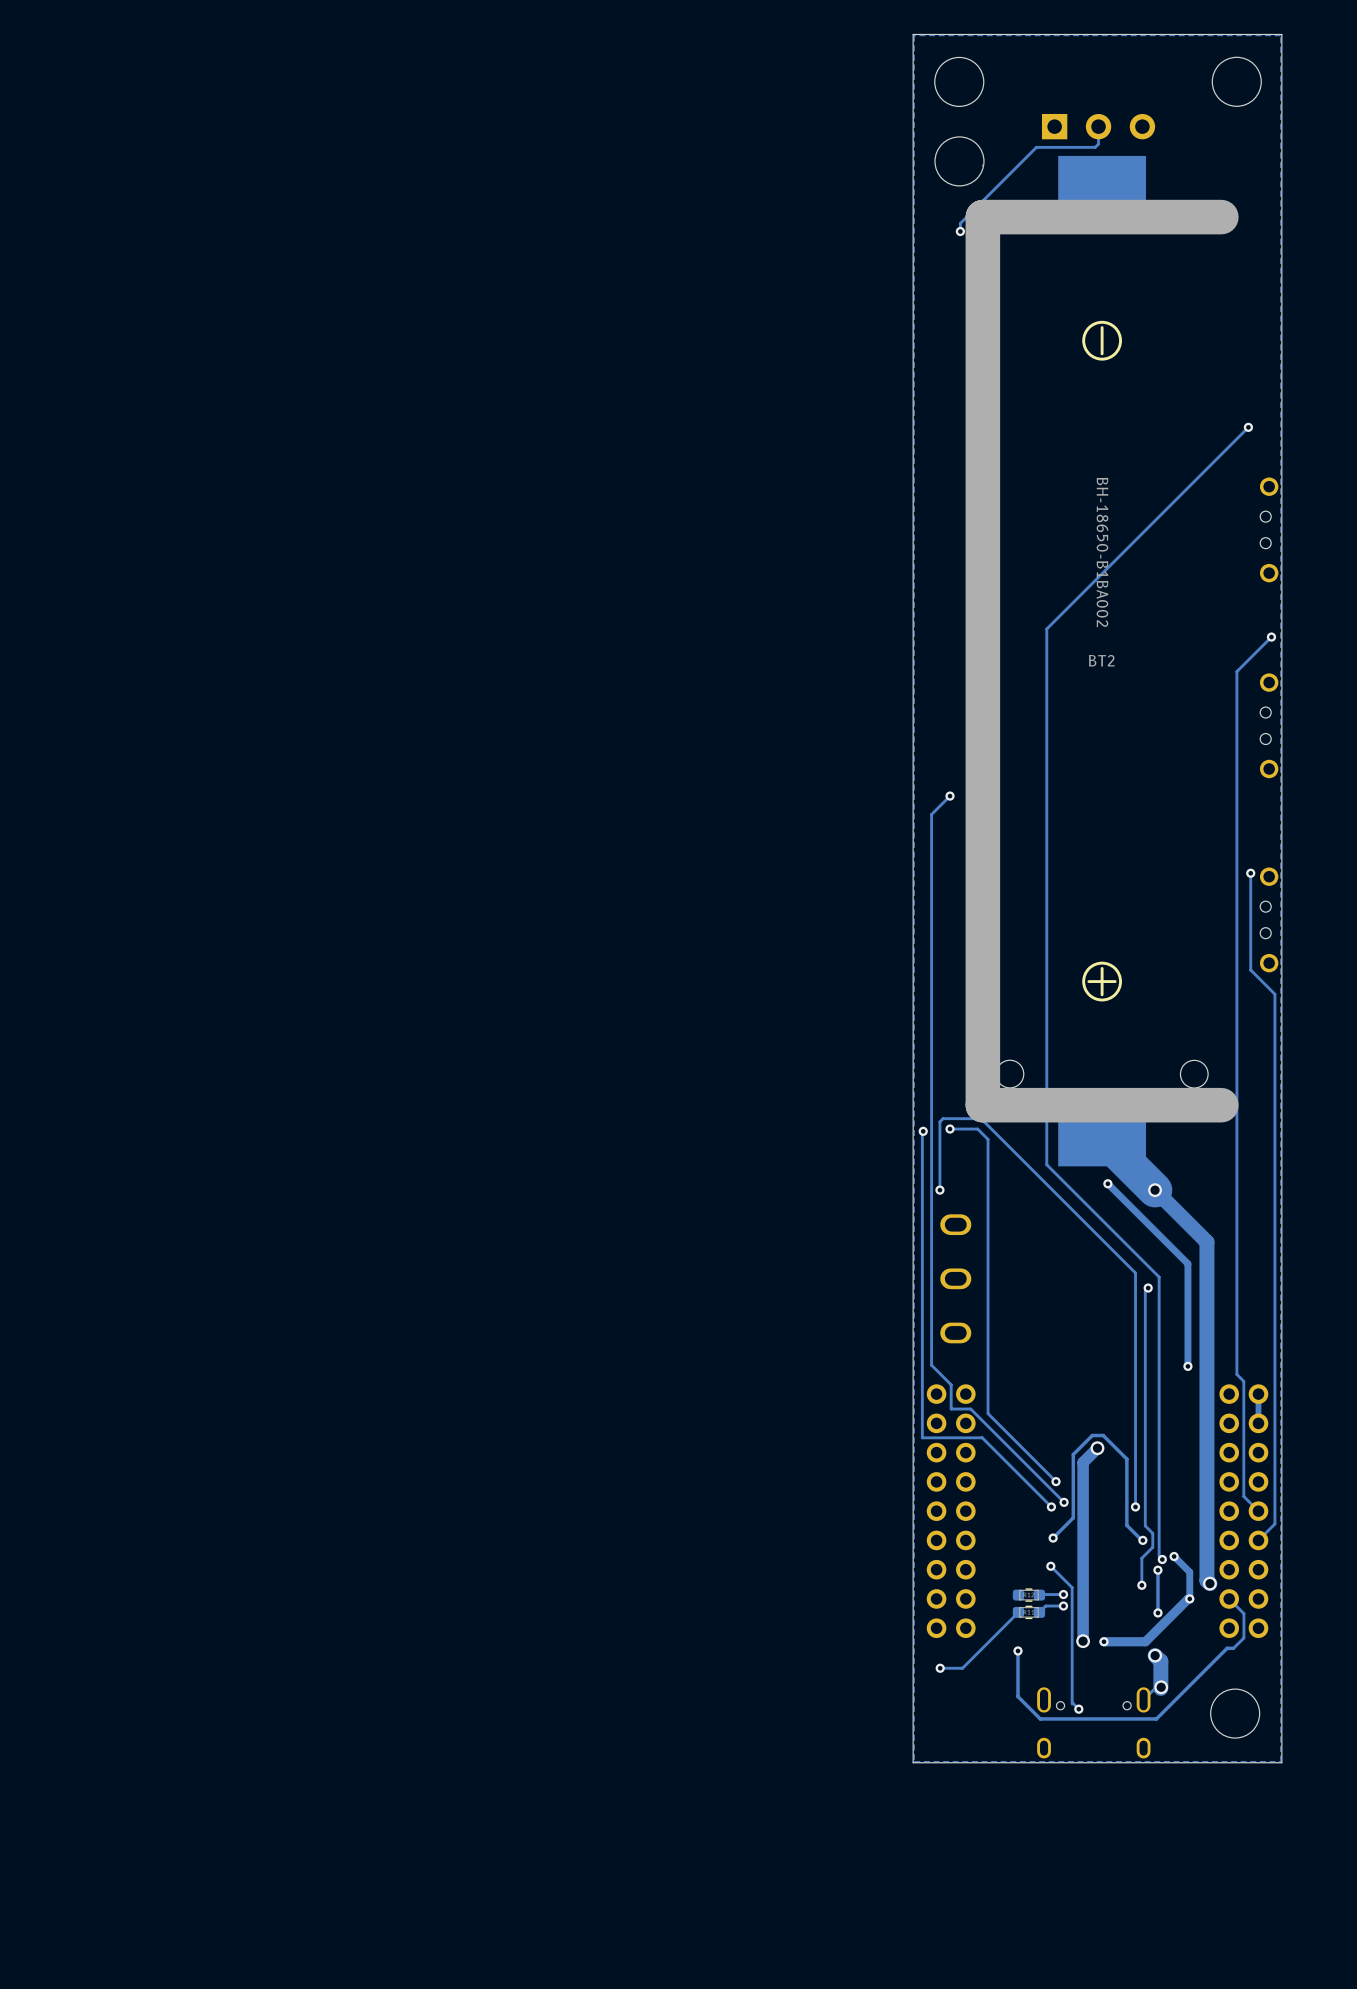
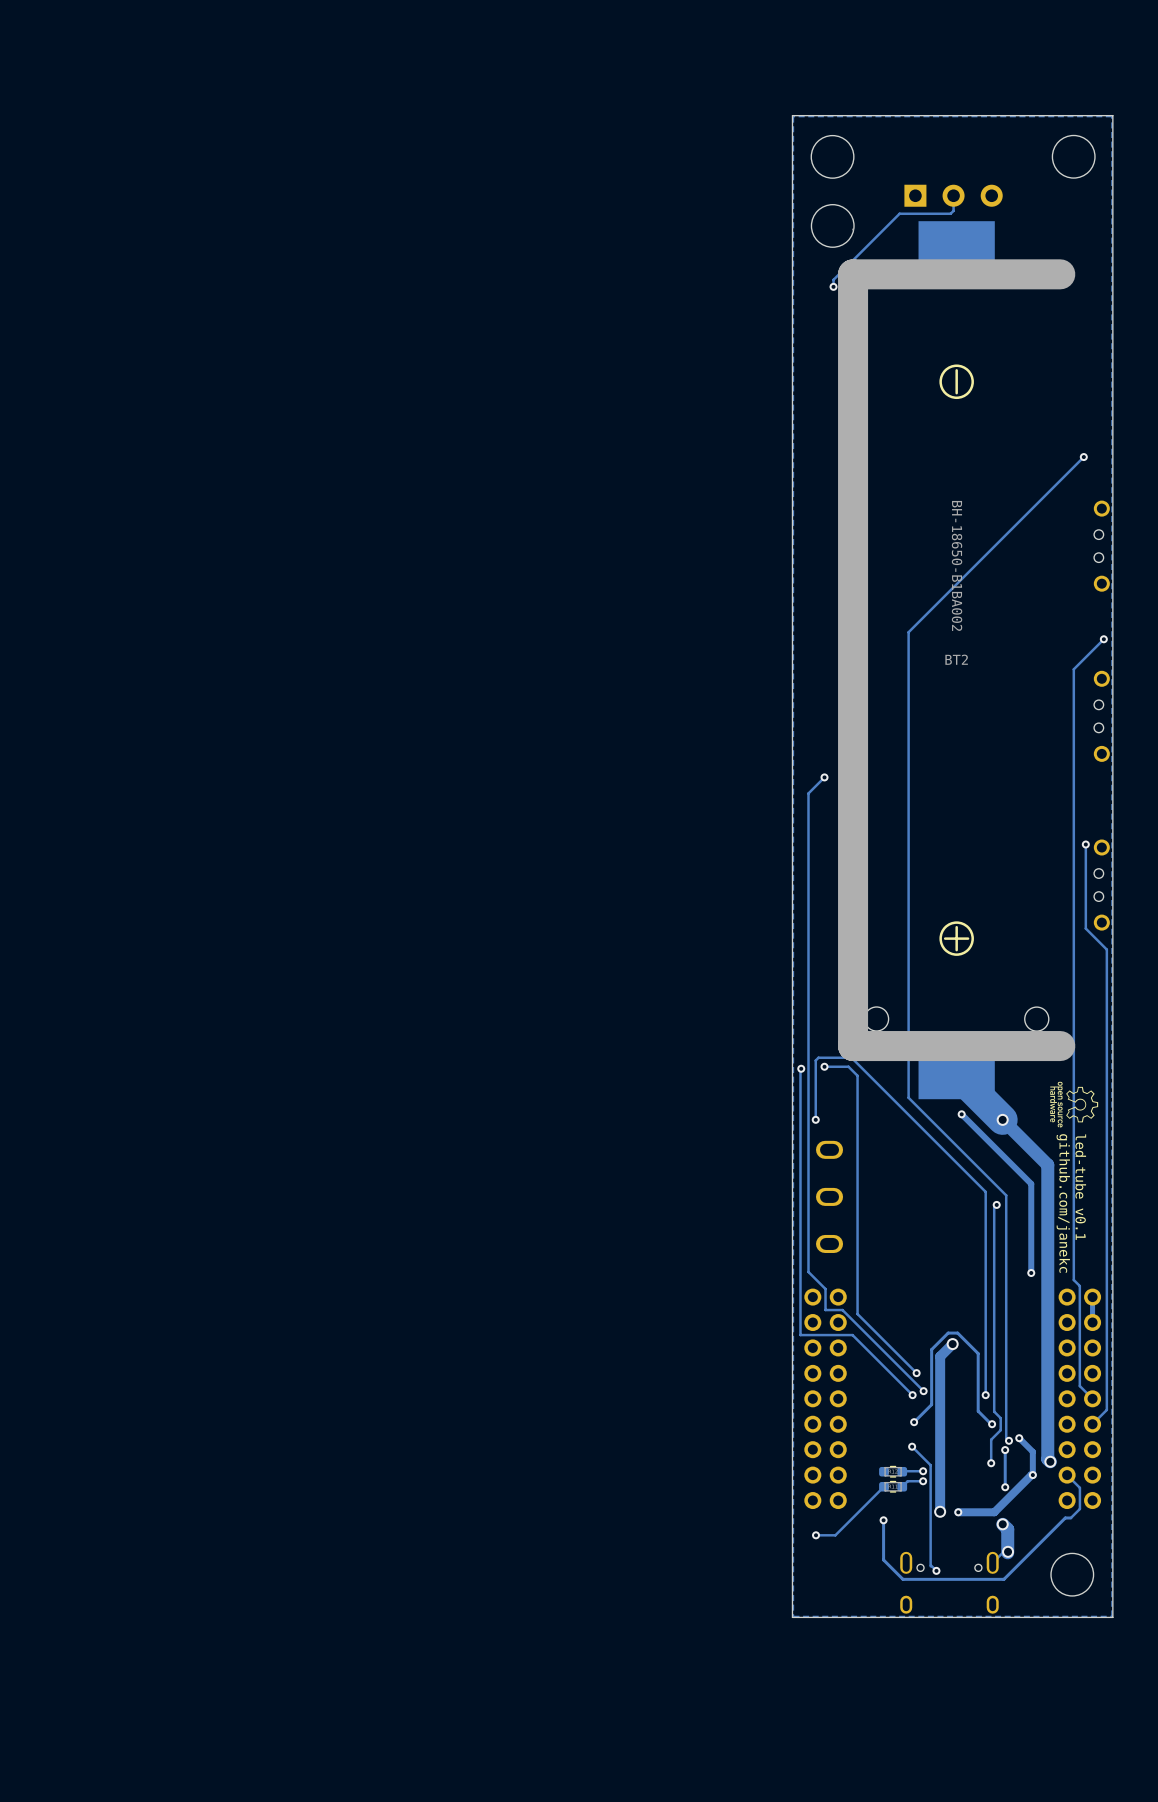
drawing: none -> [1050, 1081, 1099, 1128]
text: none -> led-tube v0.1 (1080, 1187)
text: none -> github.com/janekc (1063, 1203)

